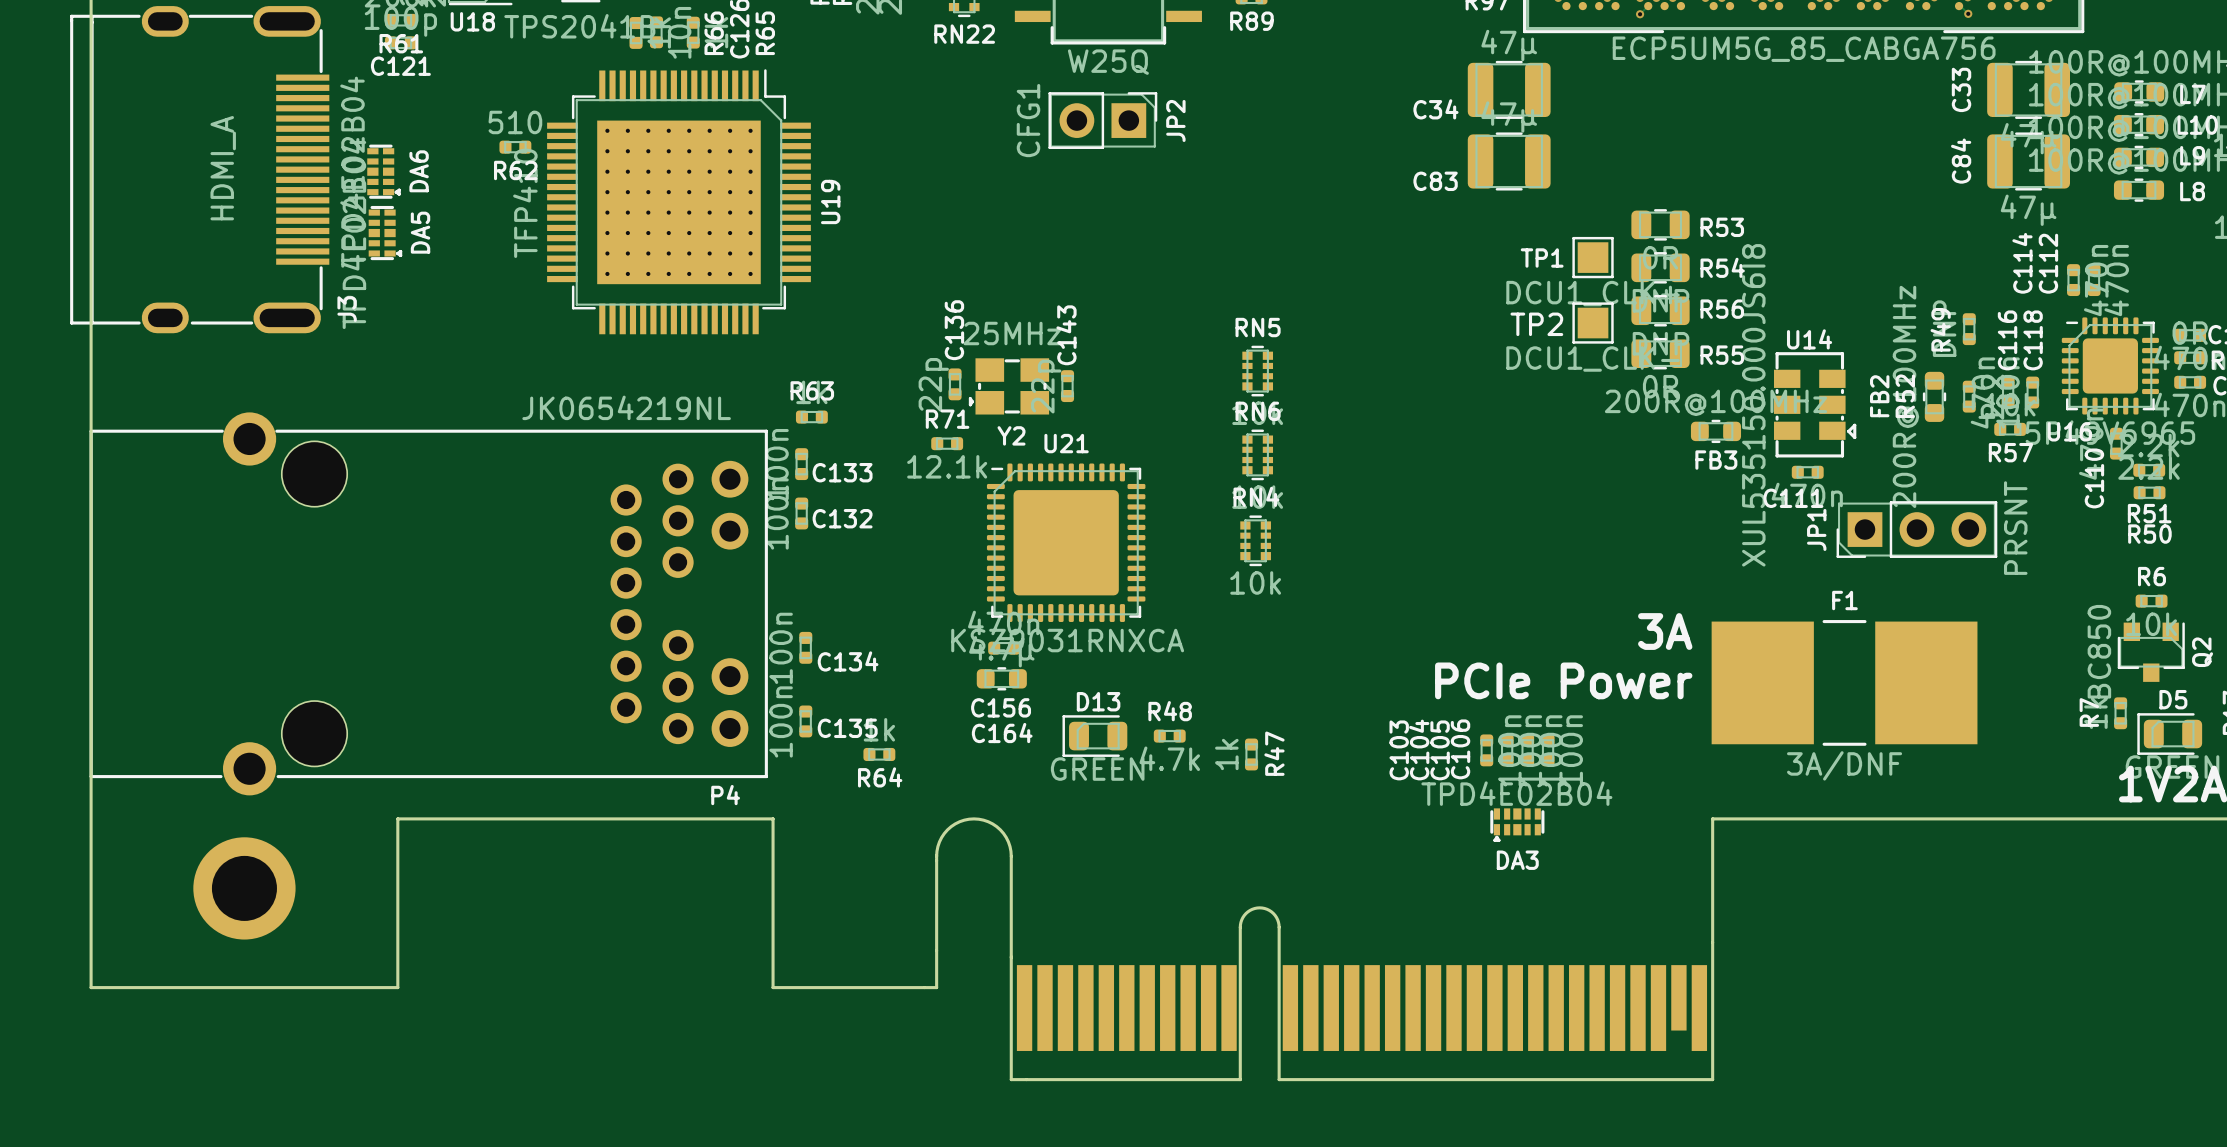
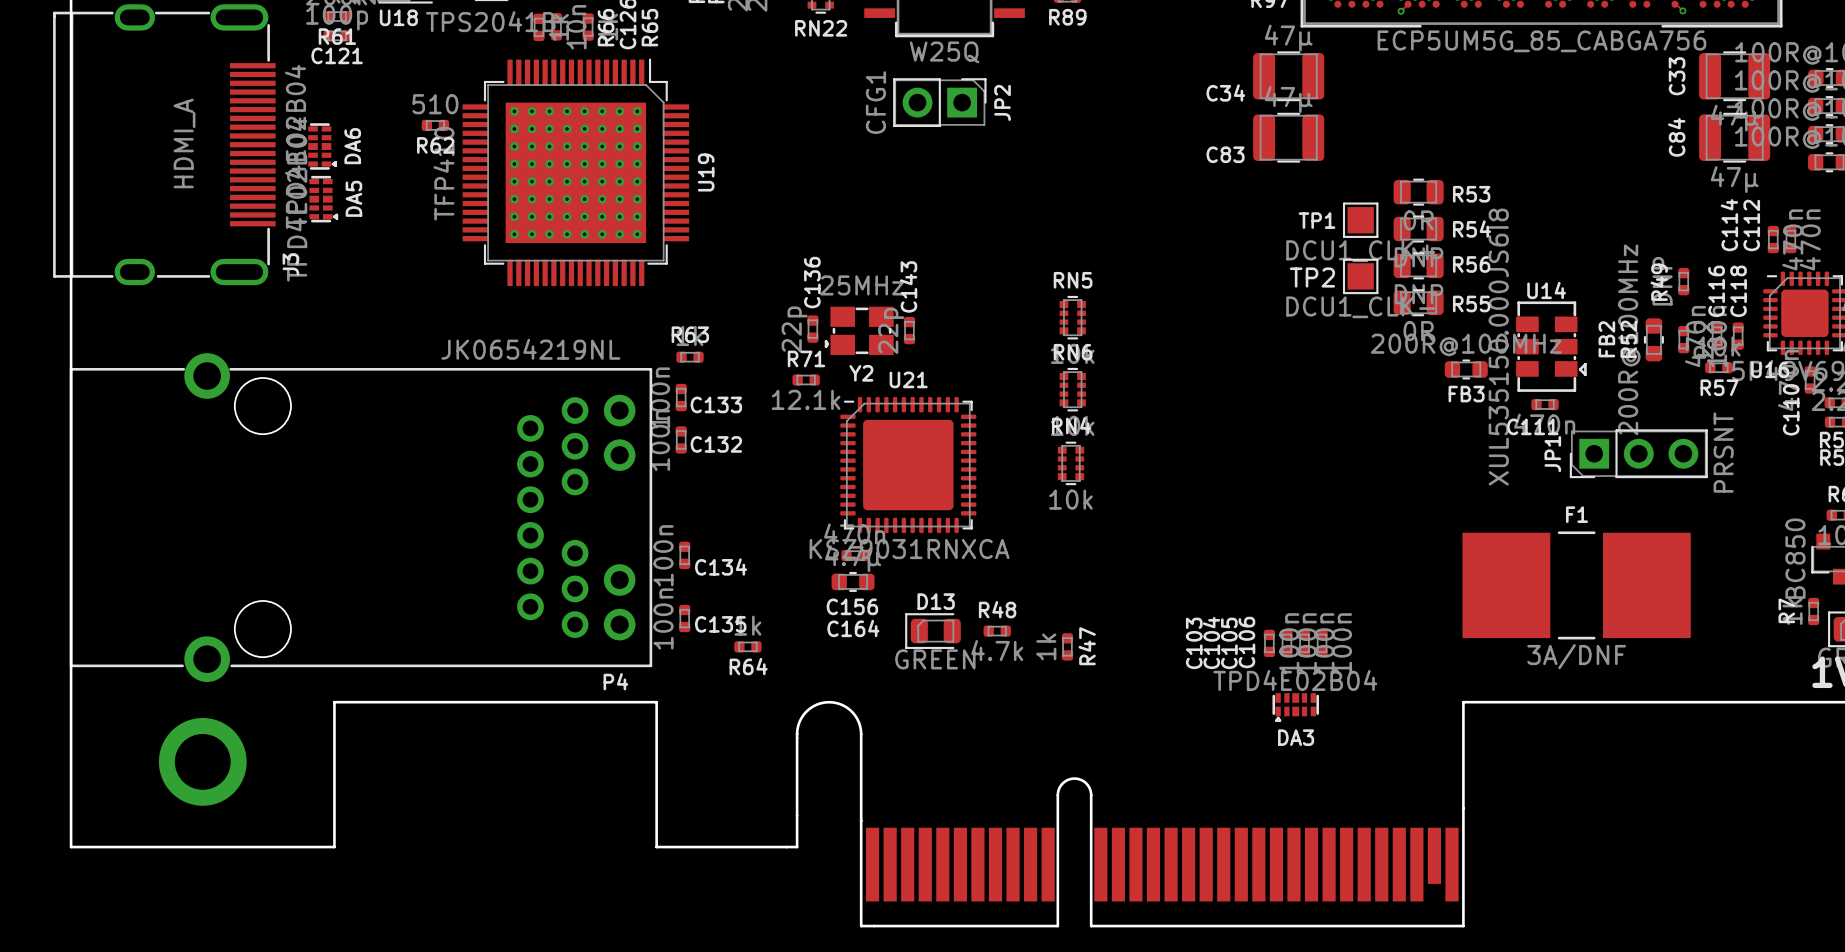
text: 3A (1665, 631) -> none
text: PCIe Power (1563, 680) -> none

